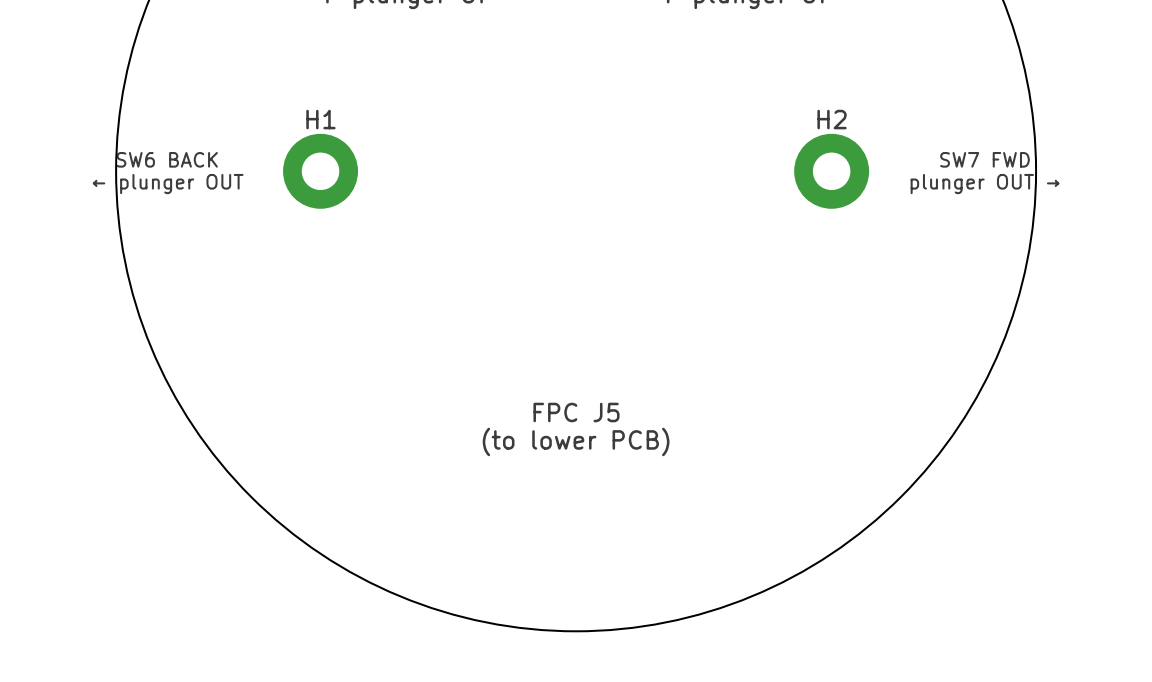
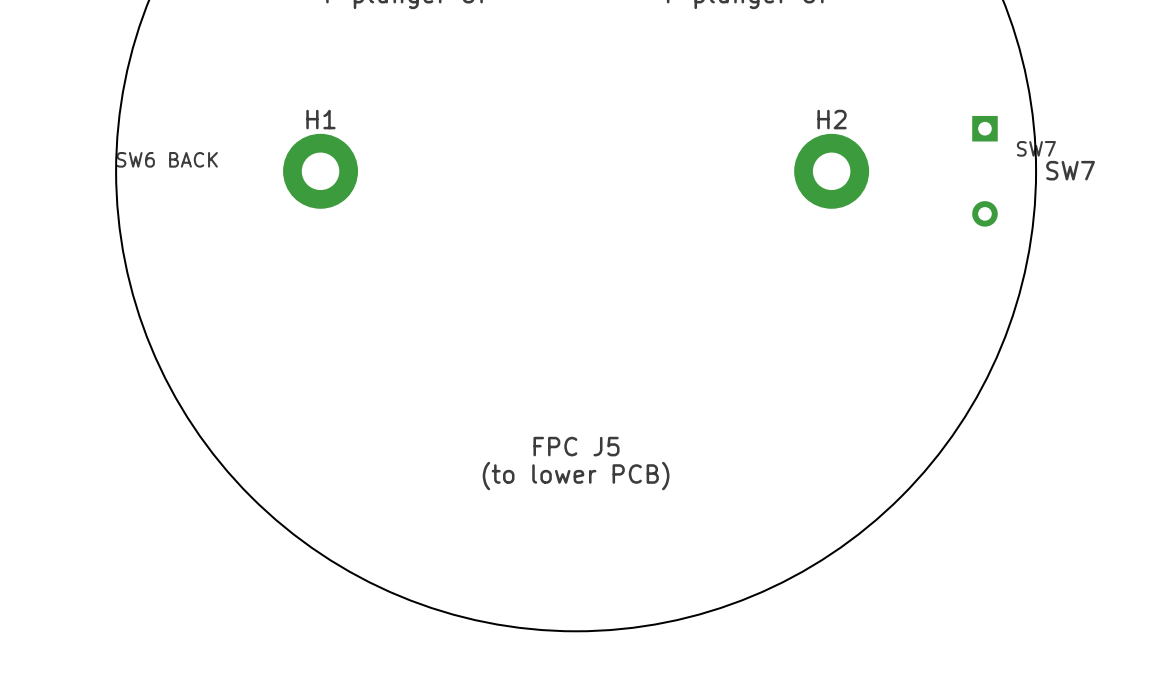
text: none -> SW7 (1036, 148)
text: SW7 FWD (984, 159) -> none
SW7: none -> (984, 171)
text: ← plunger OUT (168, 184) -> none
text: plunger OUT → (984, 184) -> none
text position: FPC J5 (576, 412) -> FPC J5 (576, 446)
text position: (to lower PCB) (576, 441) -> (to lower PCB) (576, 476)

